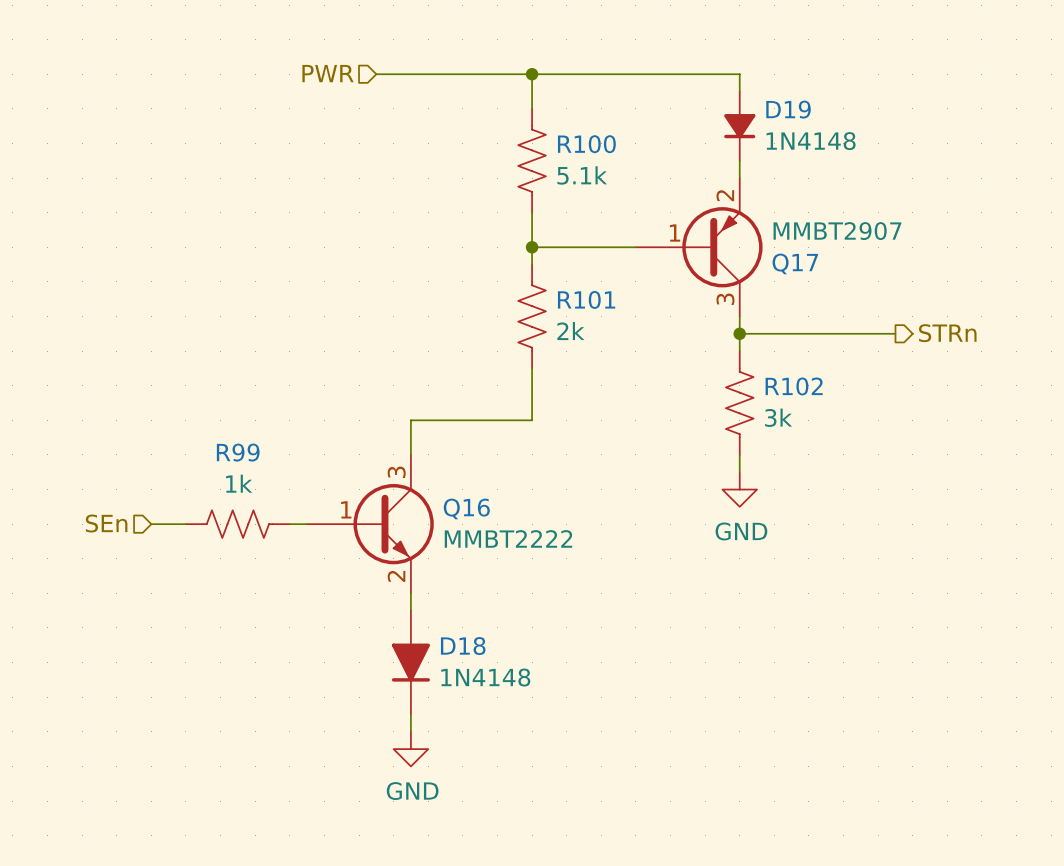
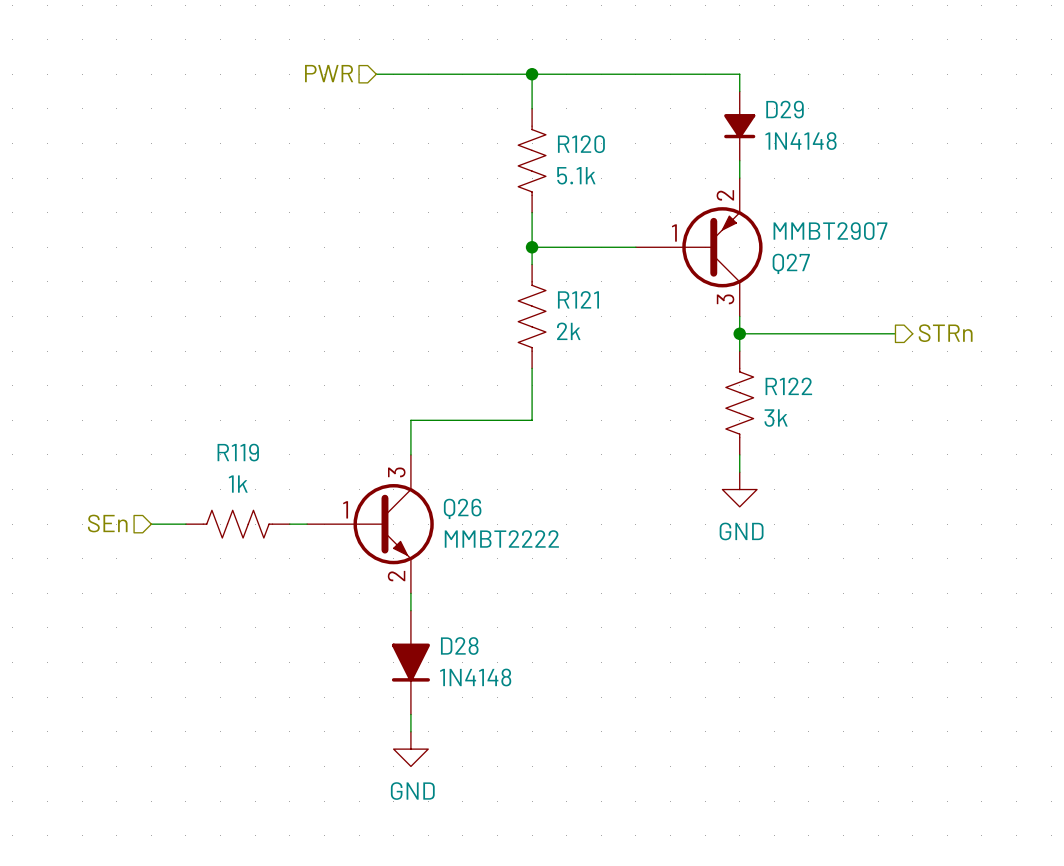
D19 name: D19 (788, 109) -> D29 (785, 109)
R100 name: R100 (586, 144) -> R120 (581, 144)
Q17 name: Q17 (795, 263) -> Q27 (791, 263)
R101 name: R101 (586, 299) -> R121 (578, 299)
R102 name: R102 (794, 386) -> R122 (788, 386)
R99 name: R99 (238, 452) -> R119 (238, 452)
Q16 name: Q16 (466, 508) -> Q26 (462, 508)
D18 name: D18 (463, 646) -> D28 (459, 645)

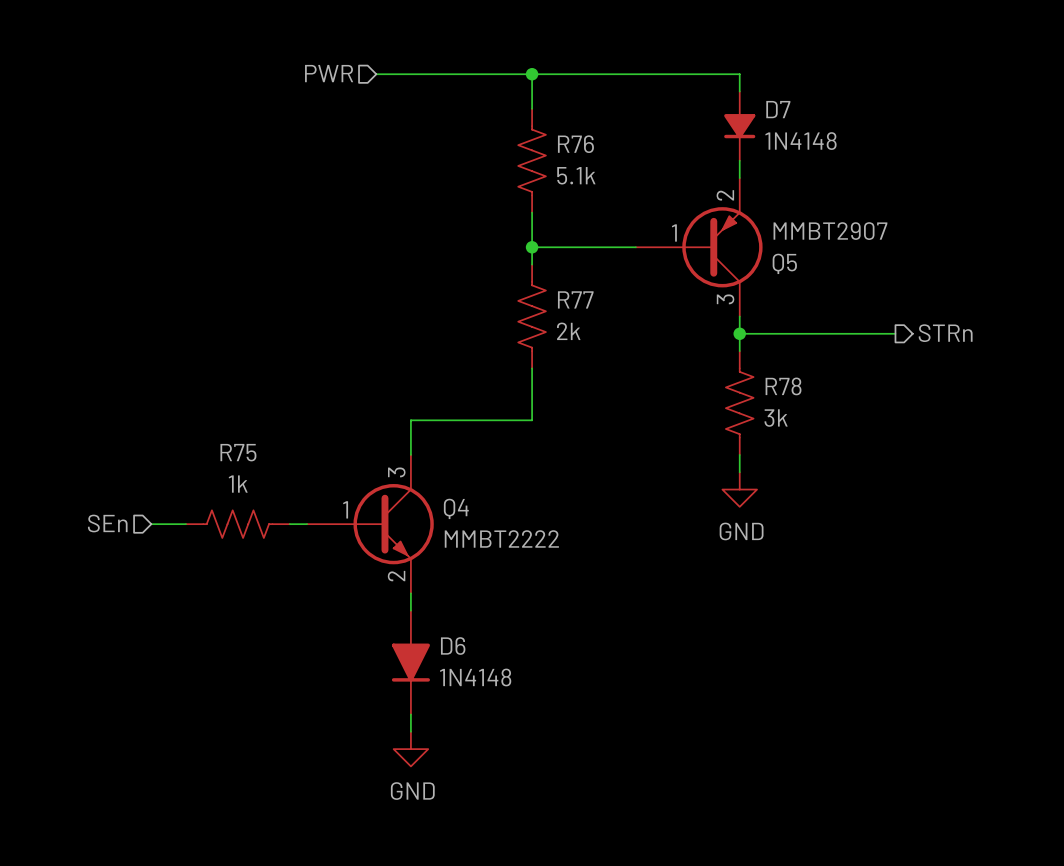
D29 name: D29 (785, 109) -> D7 (778, 109)
R120 name: R120 (581, 144) -> R76 (575, 144)
Q27 name: Q27 (791, 263) -> Q5 (784, 263)
R121 name: R121 (578, 299) -> R77 (575, 299)
R122 name: R122 (788, 386) -> R78 (783, 386)
R119 name: R119 (238, 452) -> R75 (238, 452)
Q26 name: Q26 (462, 508) -> Q4 (456, 508)
D28 name: D28 (459, 645) -> D6 (453, 646)

